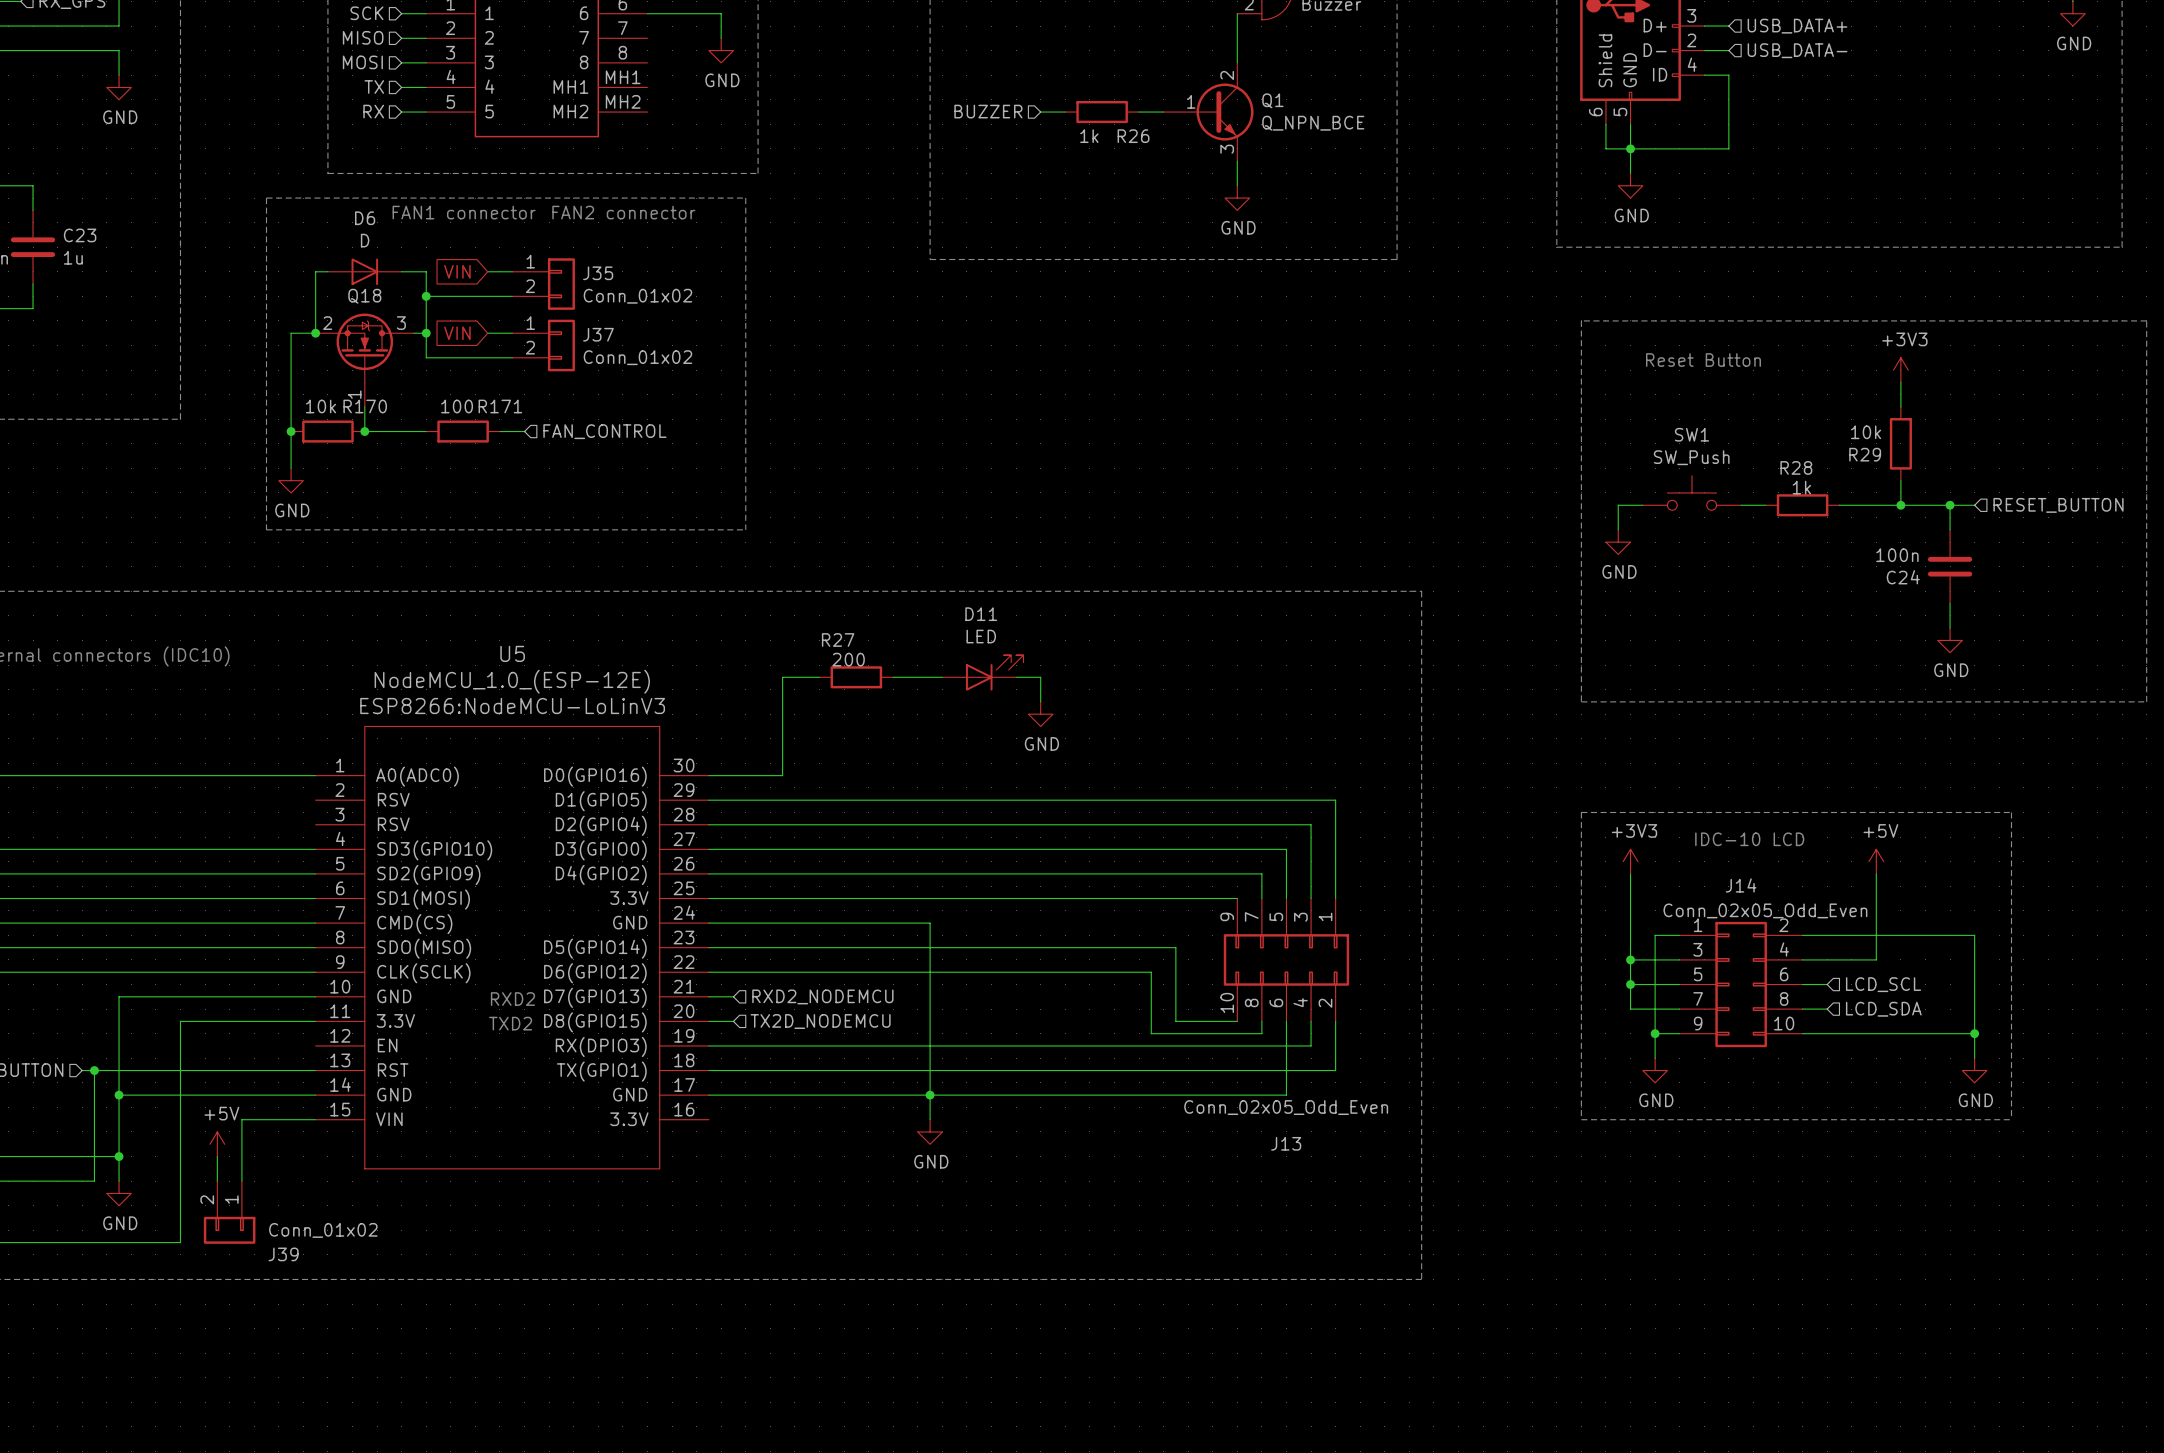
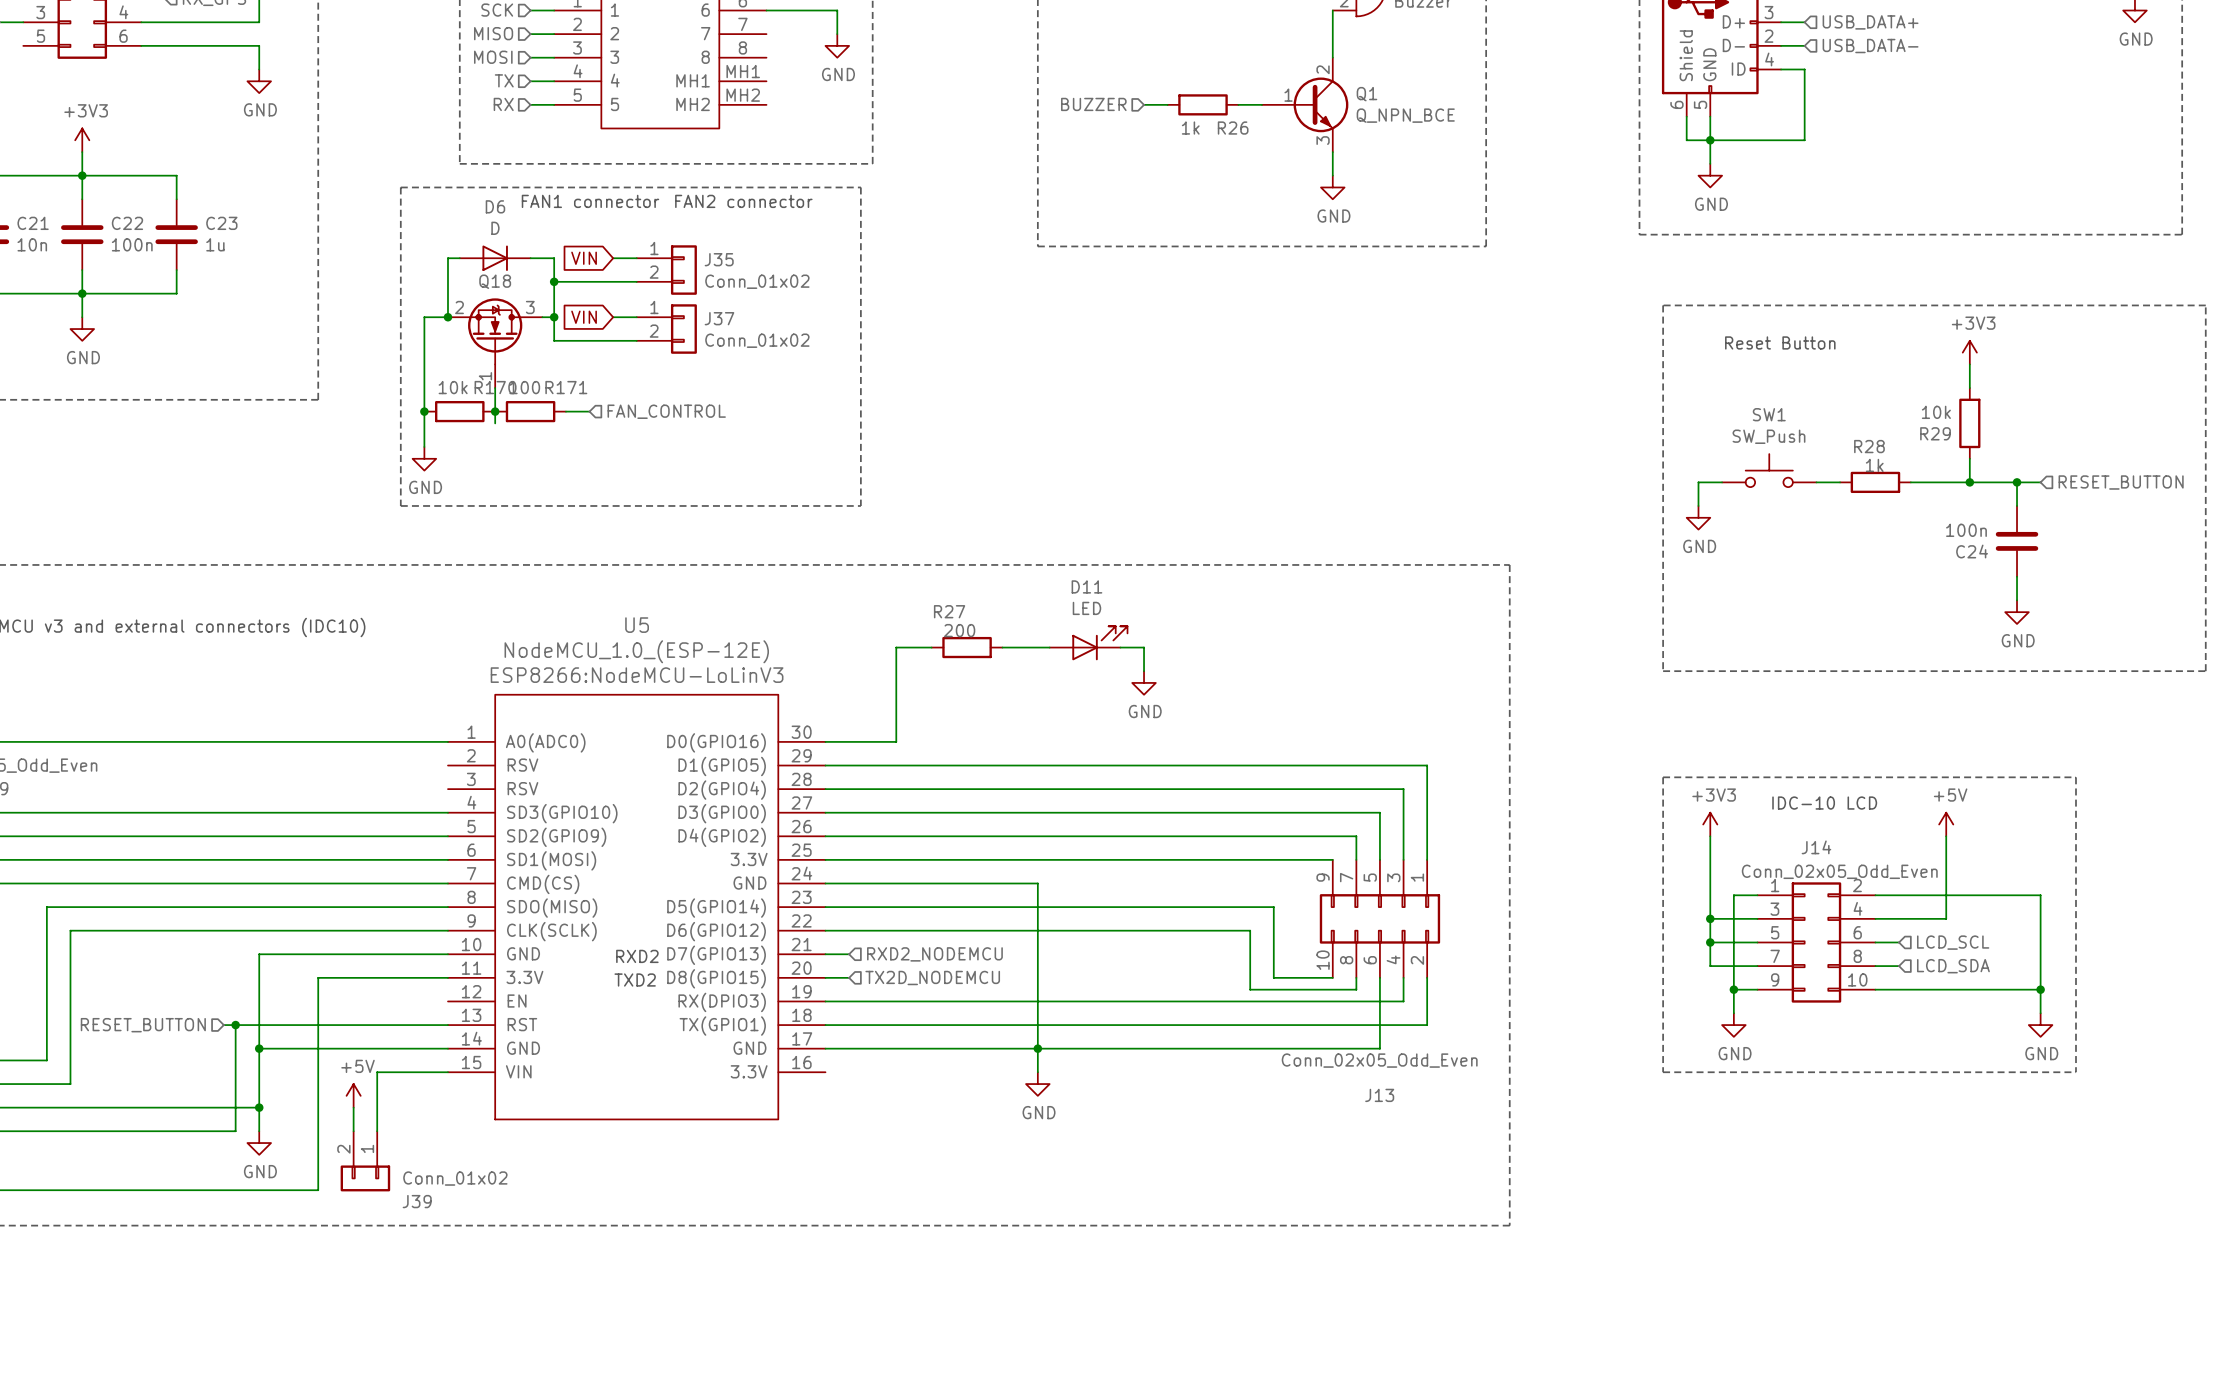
wire: (364, 431) (426, 431) -> (495, 411) (495, 423)
R171 position: (463, 431) -> (530, 411)
wire: (499, 431) (524, 431) -> (565, 411) (589, 411)
hierarchical label position: FAN_CONTROL (604, 431) -> FAN_CONTROL (666, 411)

